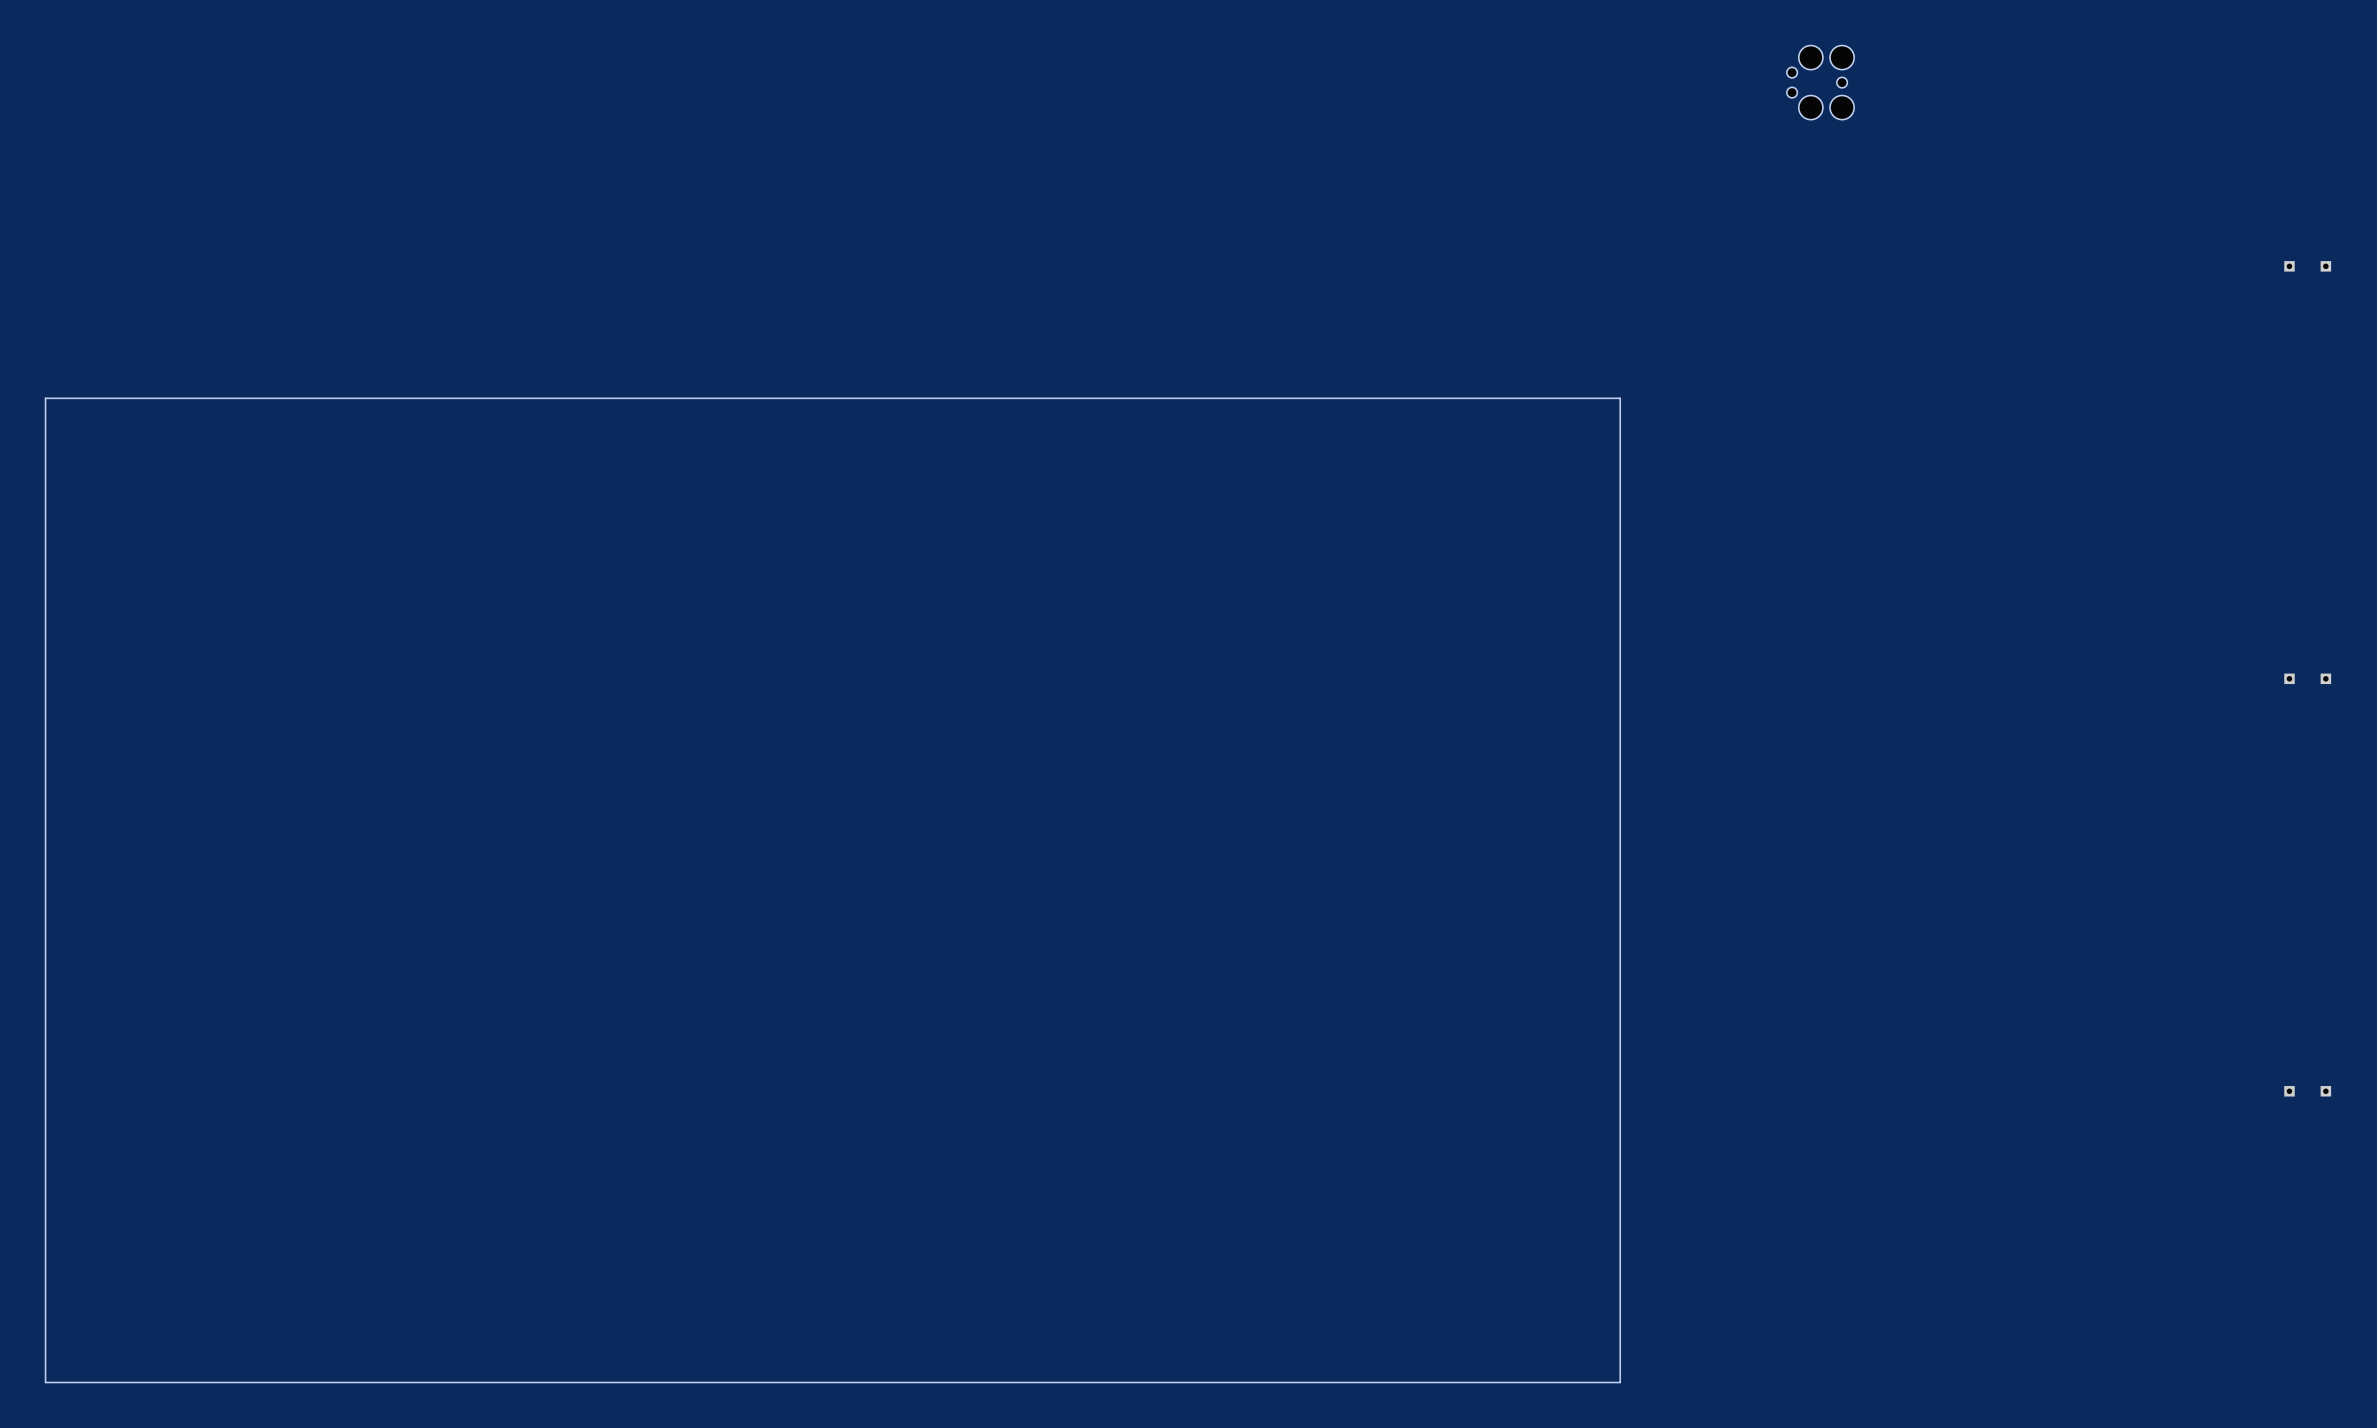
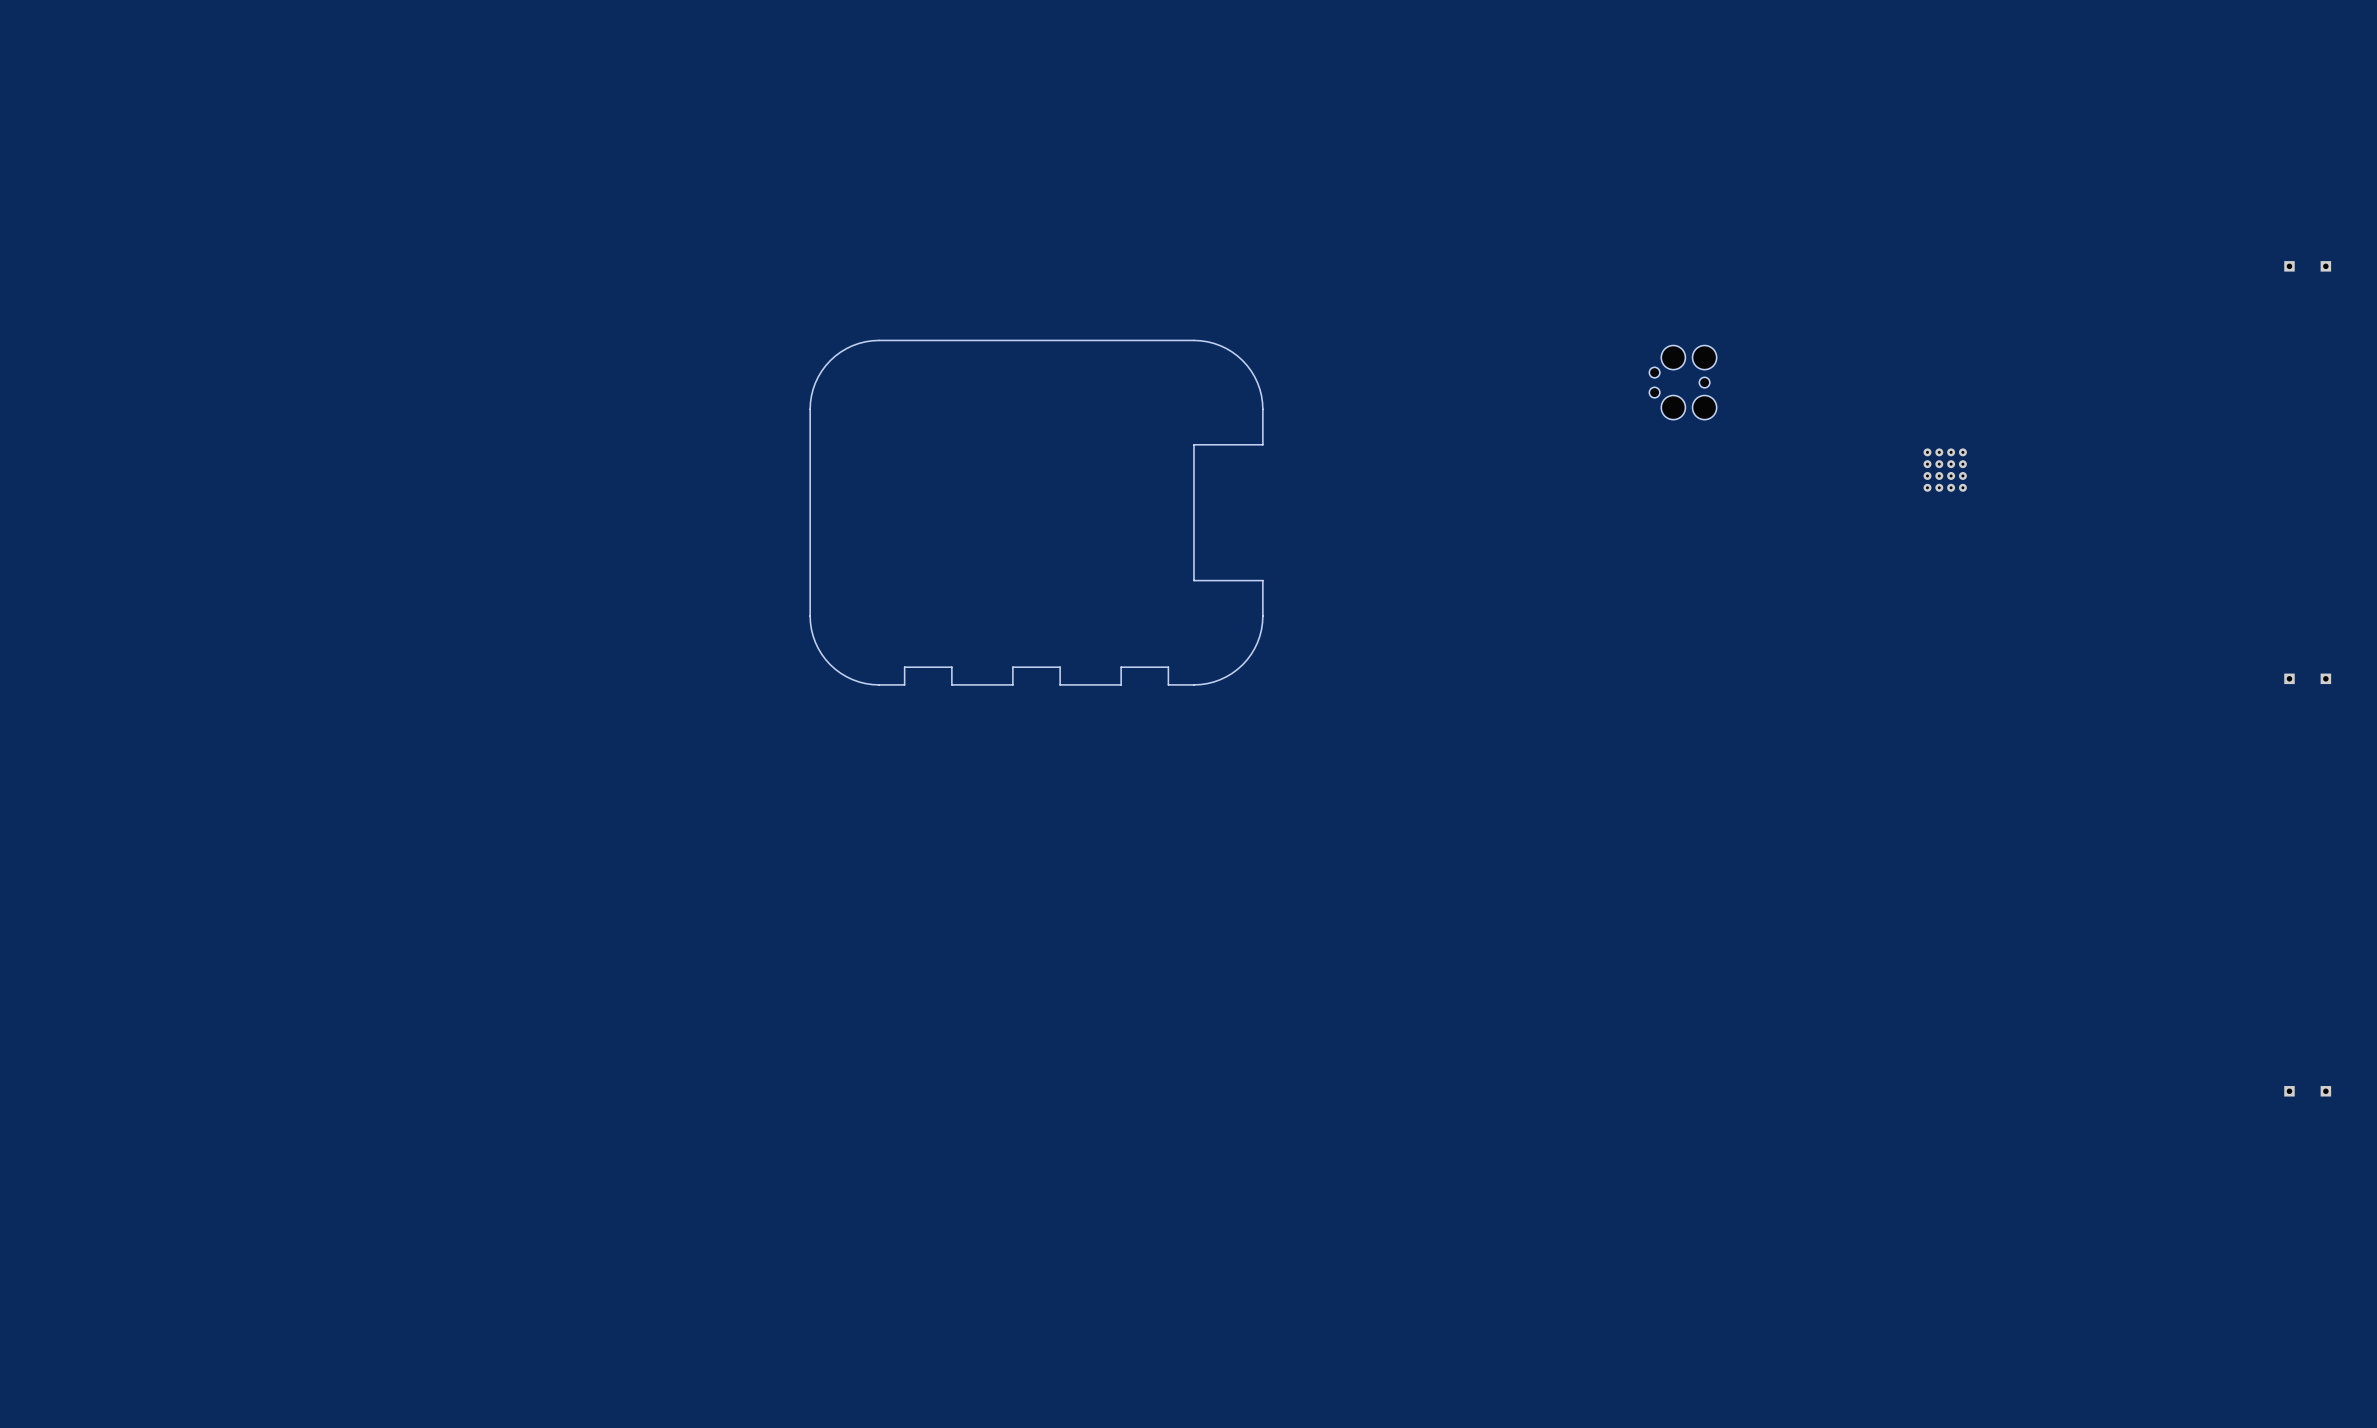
part: (1820, 82) -> none
board edge: none -> (1193, 340) (879, 340) (852, 345) (835, 356) (825, 365) (815, 382) (810, 409) (810, 622) (815, 642) (825, 659) (835, 669) (852, 679) (879, 684) (904, 684) (904, 667) (951, 667) (951, 684) (1012, 684) (1012, 667) (1060, 667) (1060, 684) (1121, 684) (1121, 667) (1168, 667) (1168, 684) (1207, 683) (1220, 679) (1237, 669) (1251, 654) (1259, 636) (1262, 622) (1262, 580) (1193, 580) (1193, 444) (1262, 444) (1262, 402) (1254, 376) (1237, 356) (1220, 345) (1193, 340)
part: none -> (1683, 382)
board edge: (1620, 398) (45, 398) (45, 1382) (1620, 1382) (1620, 398) -> none
part: none -> (1945, 470)

